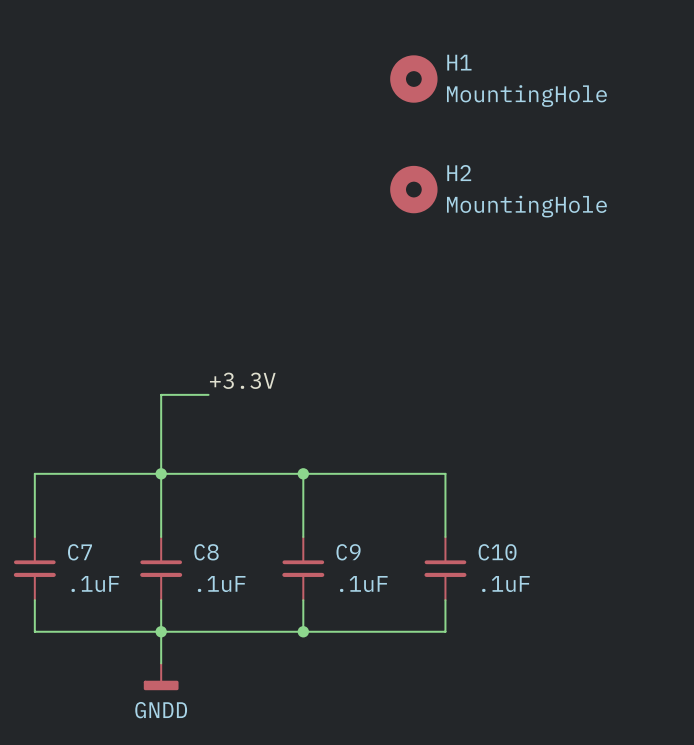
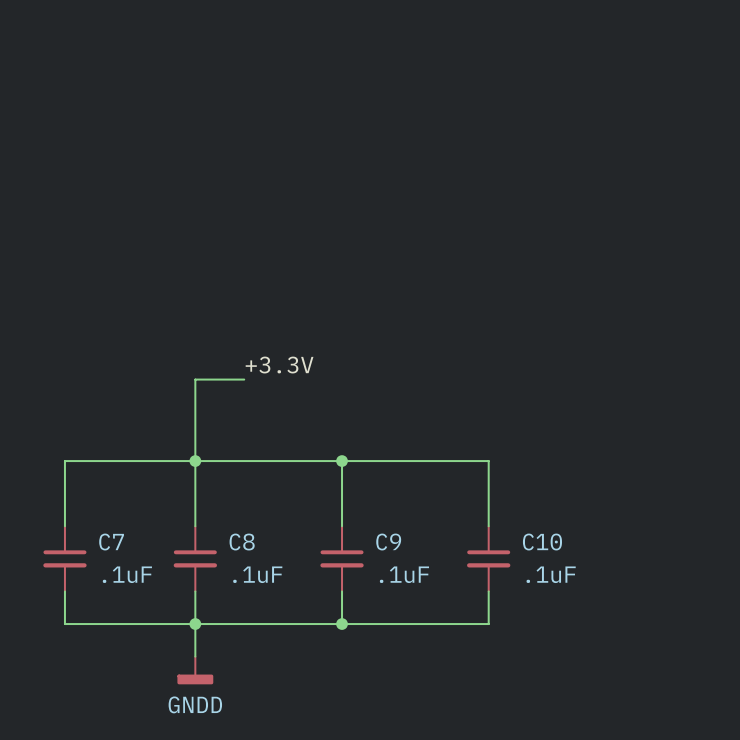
H1: MountingHole (413, 79) -> none
H2: MountingHole (413, 189) -> none

